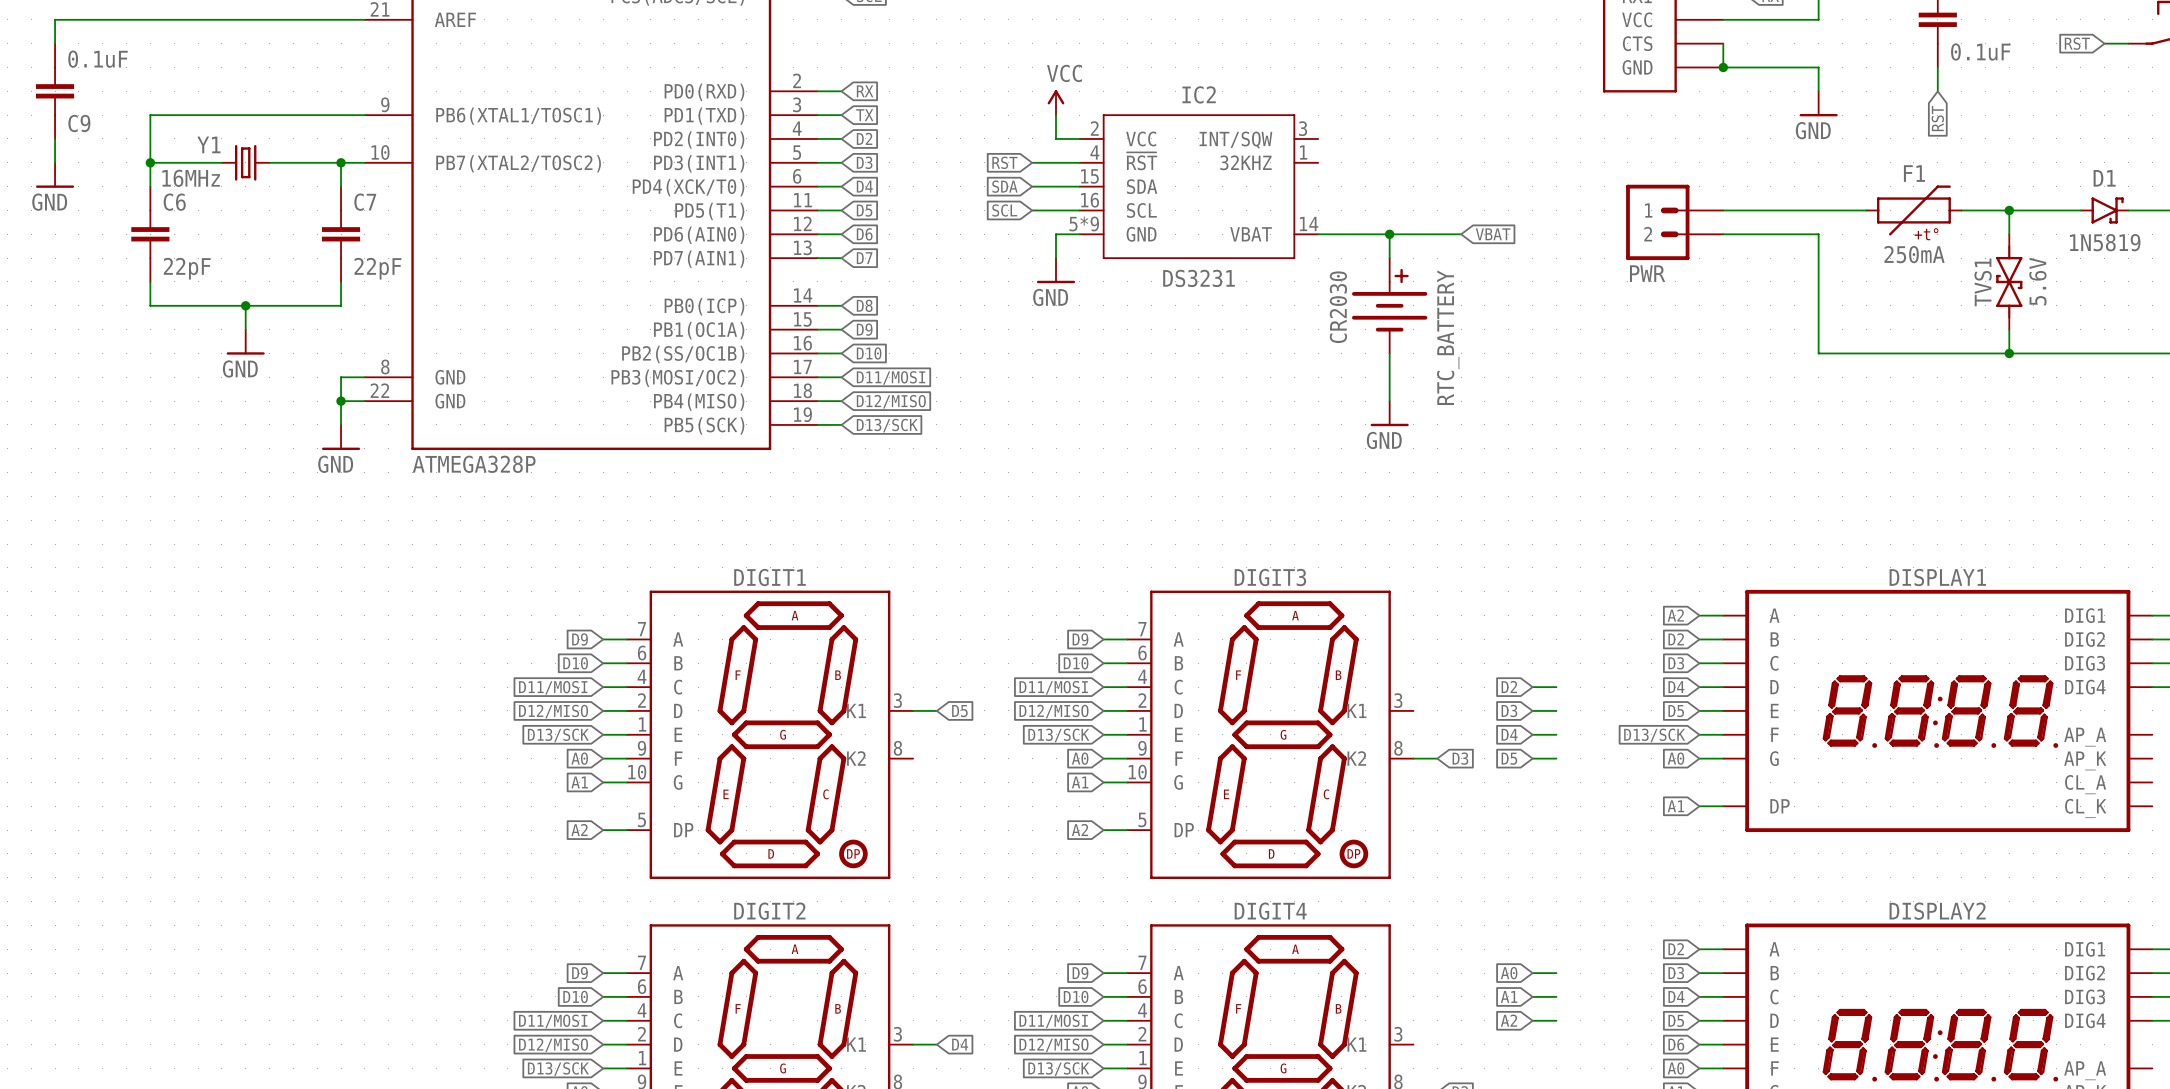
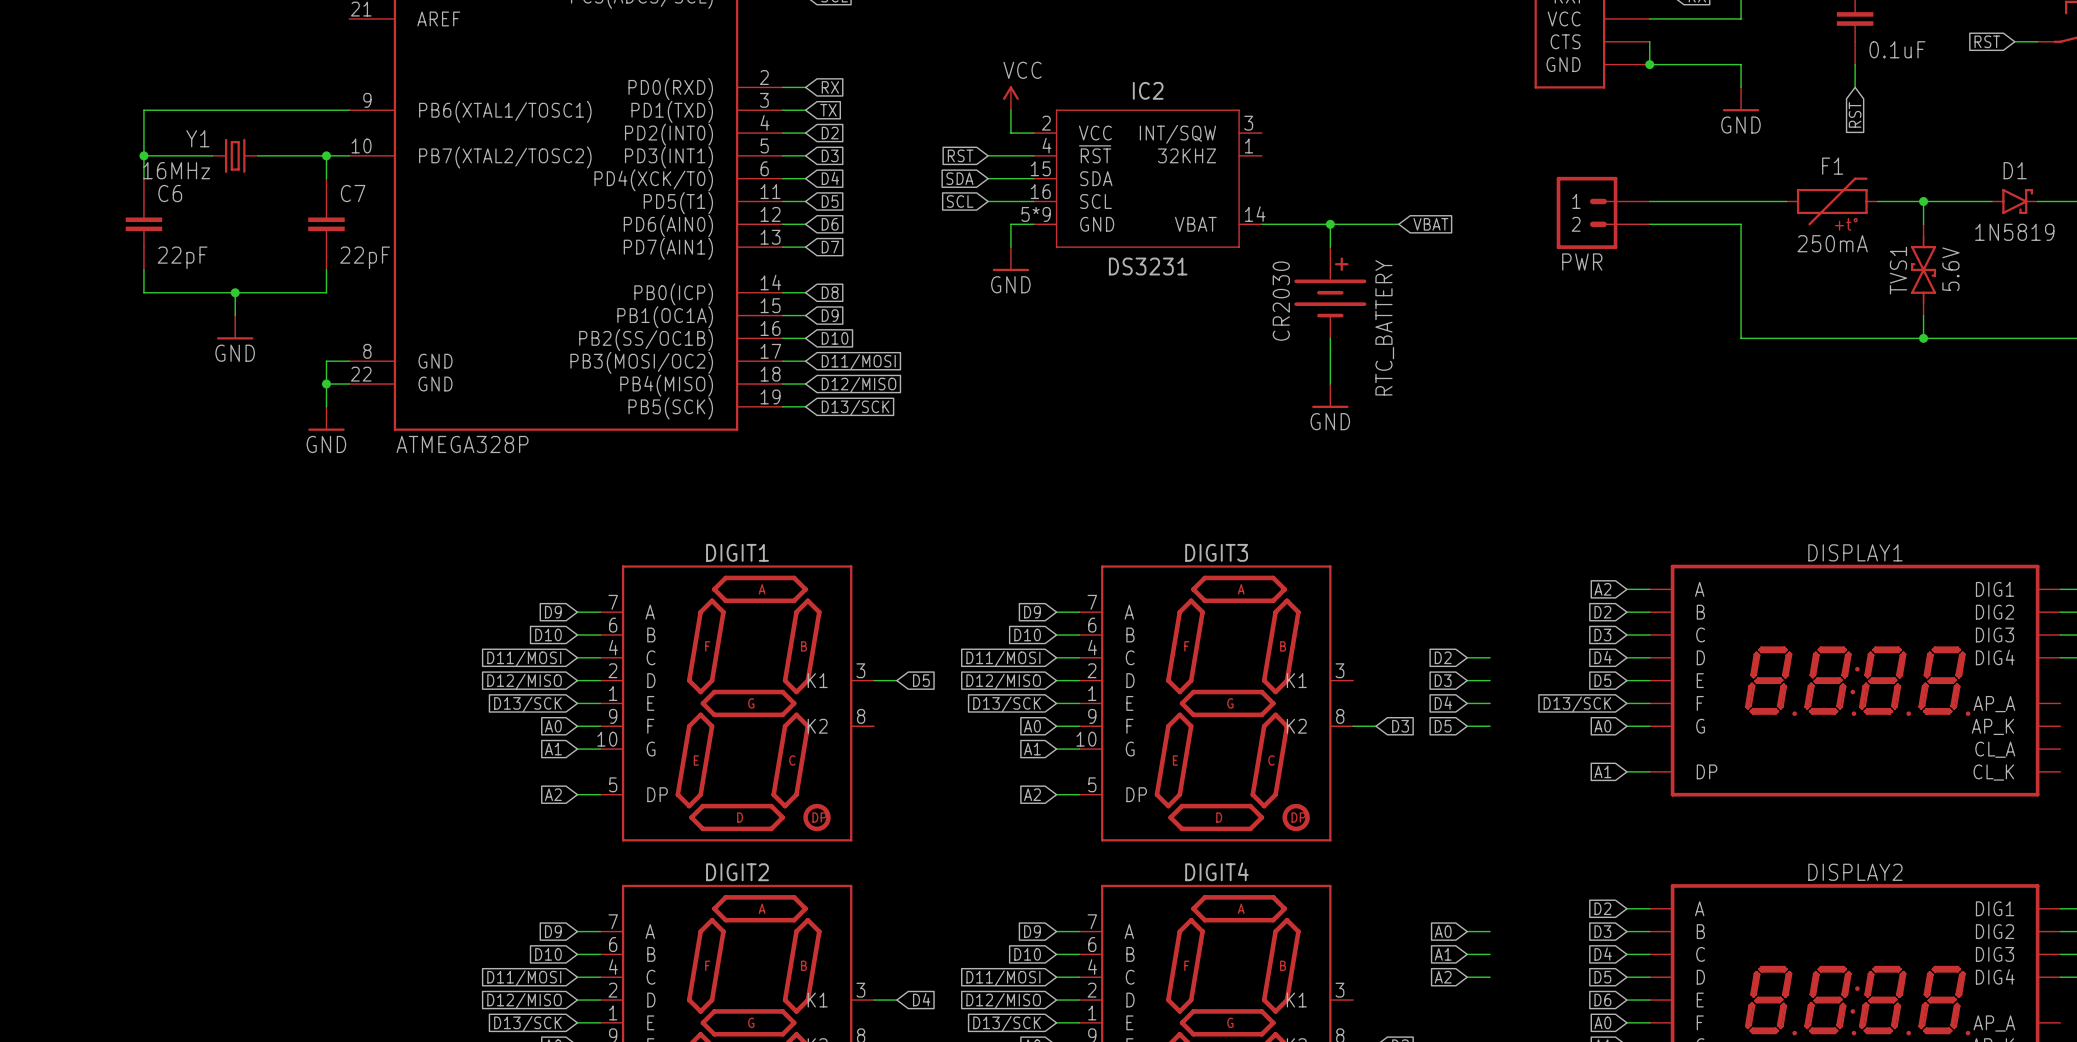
wire: (364, 19) (55, 19) (55, 43) -> none
C9: 0.1uF (55, 91) -> none
wire: (55, 138) (55, 162) -> none
power symbol: GND (55, 175) -> none

